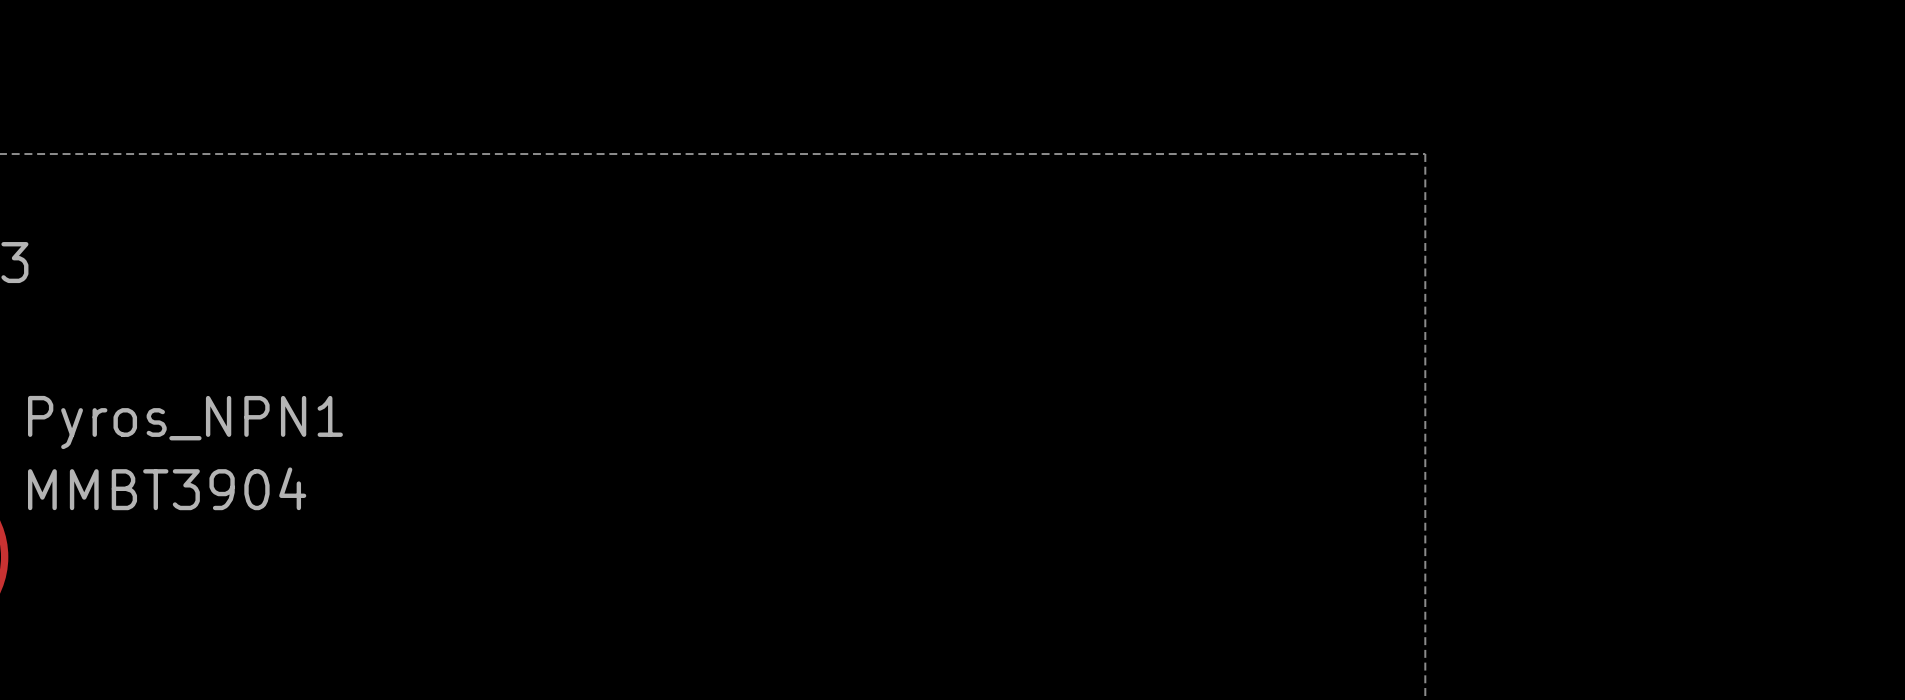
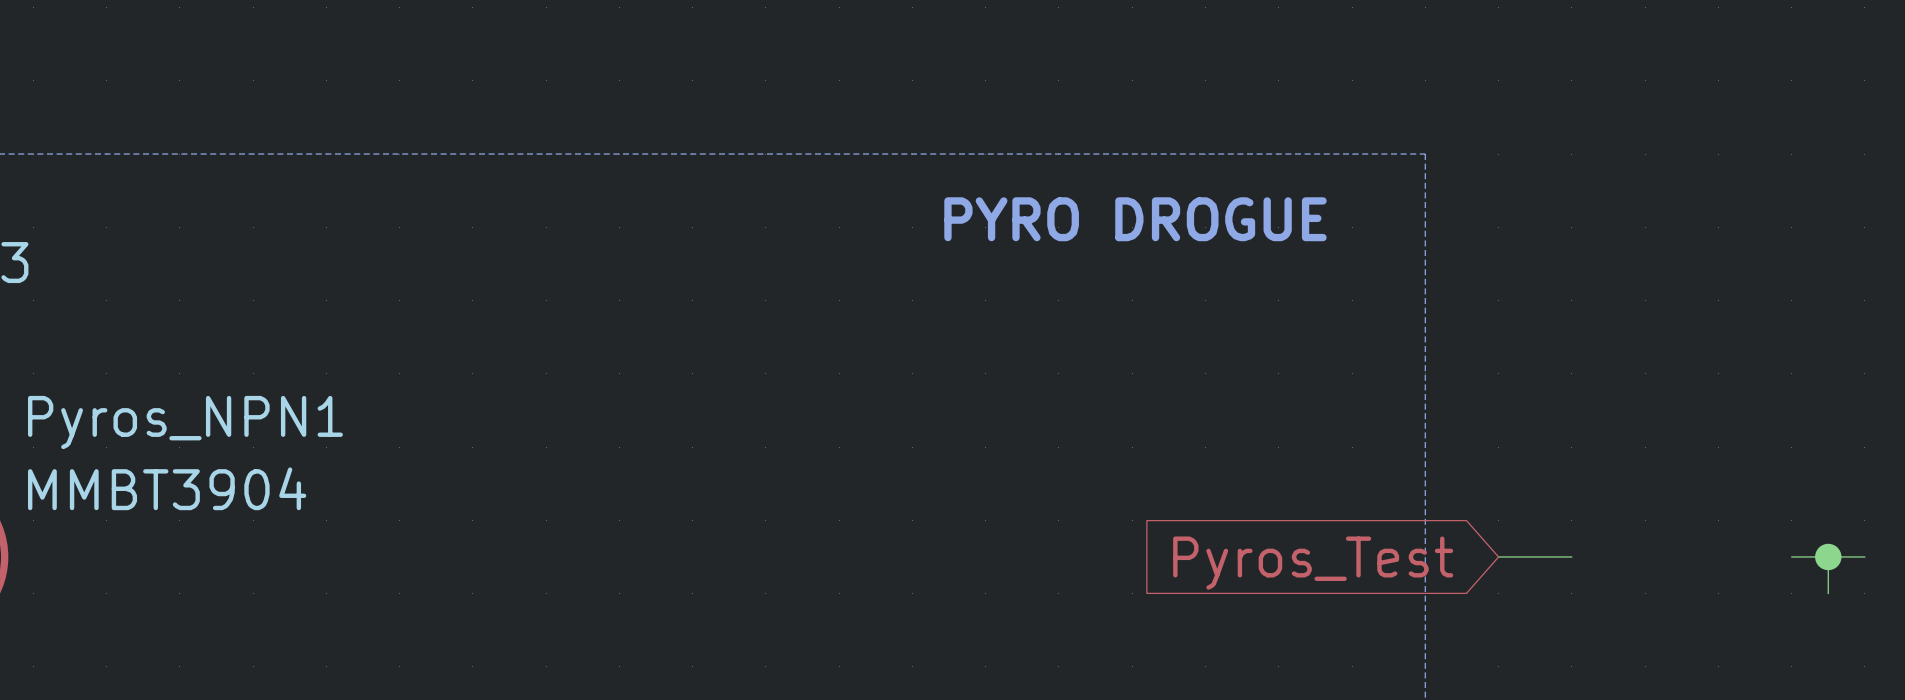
text: none -> PYRO DROGUE (1135, 219)
wire: none -> (1498, 556) (1571, 556)
wire: none -> (1791, 556) (1864, 556)
wire: none -> (1828, 556) (1828, 593)
junction: none -> (1828, 556)
global label: none -> Pyros_Test (1313, 563)

